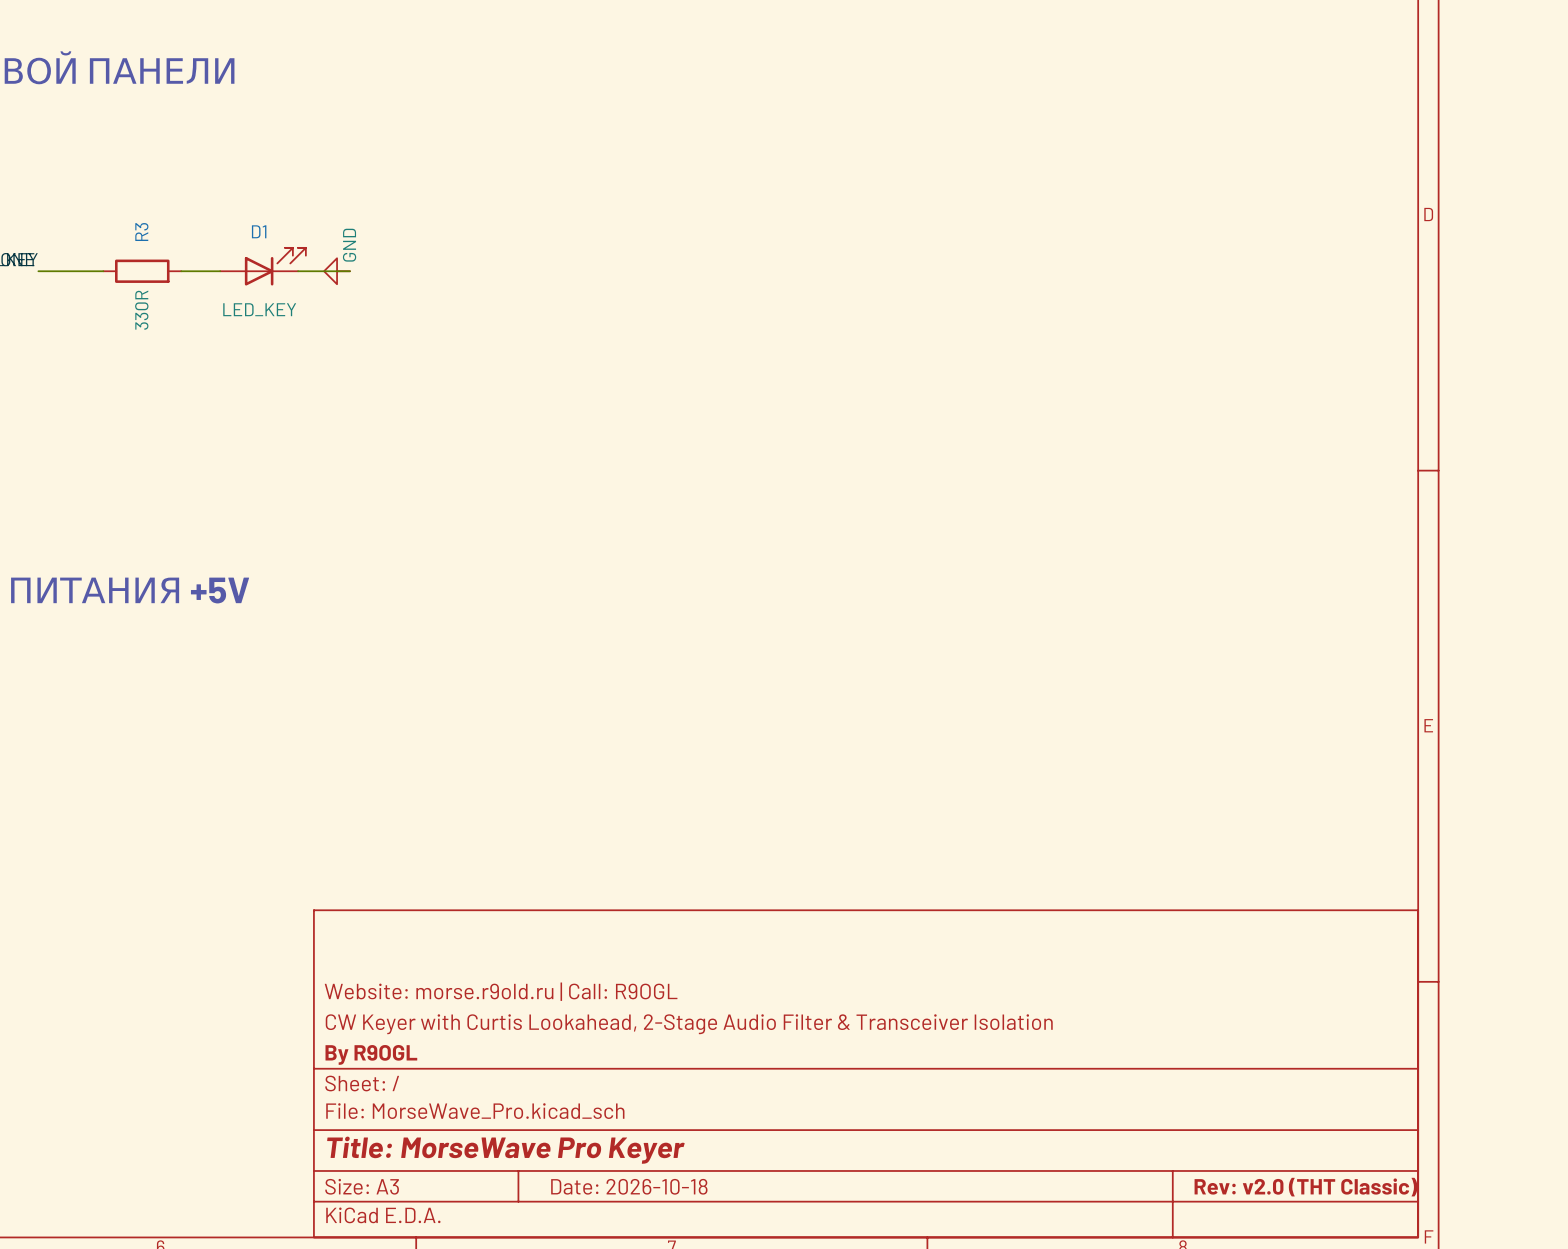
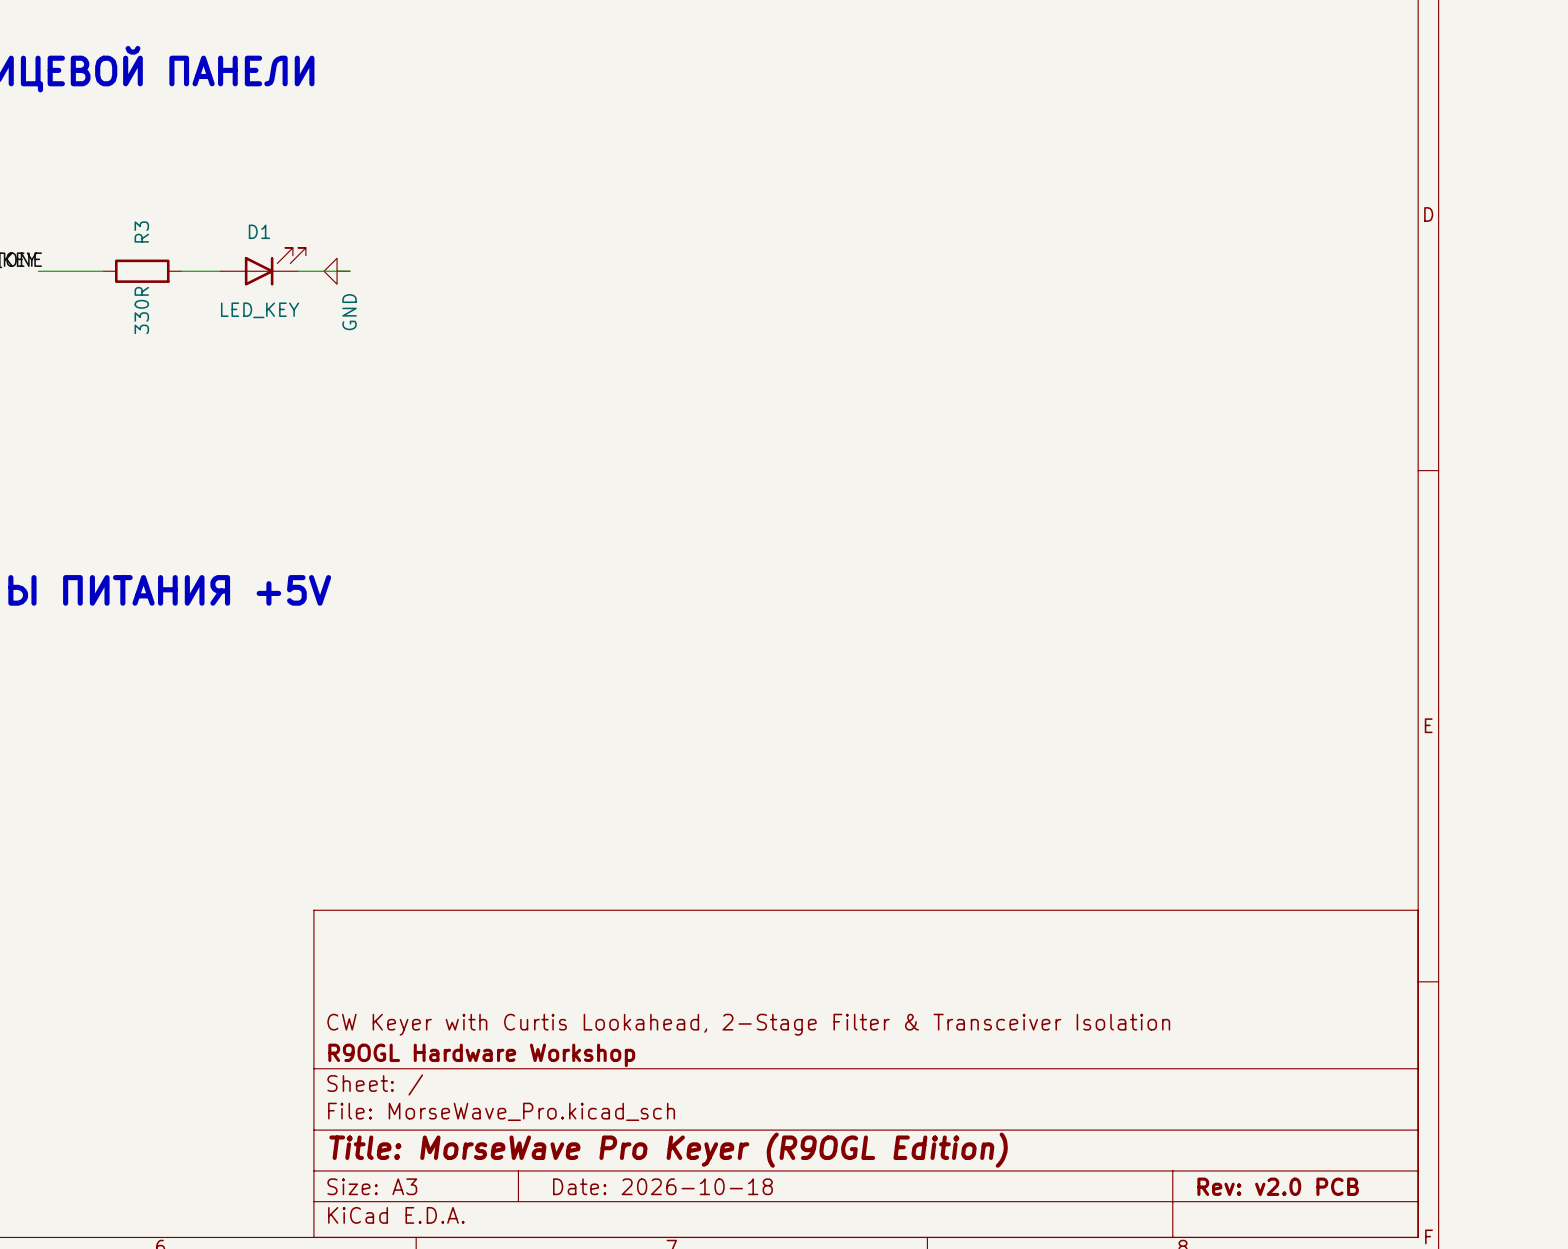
power symbol text position: GND (349, 245) -> GND (349, 312)
title block: Website: morse.r9old.ru | Call: R9OGL (501, 991) -> none
title block: CW Keyer with Curtis Lookahead, 2-Stage Audio Filter & Transceiver Isolation (689, 1024) -> CW Keyer with Curtis Lookahead, 2-Stage Filter & Transceiver Isolation (748, 1024)
title block: By R9OGL (371, 1054) -> R9OGL Hardware Workshop (481, 1055)
title block: Title: MorseWave Pro Keyer (505, 1150) -> Title: MorseWave Pro Keyer (R9OGL Edition) (668, 1150)
title block: Rev: v2.0 (THT Classic) (1306, 1187) -> Rev: v2.0 PCB (1278, 1186)

